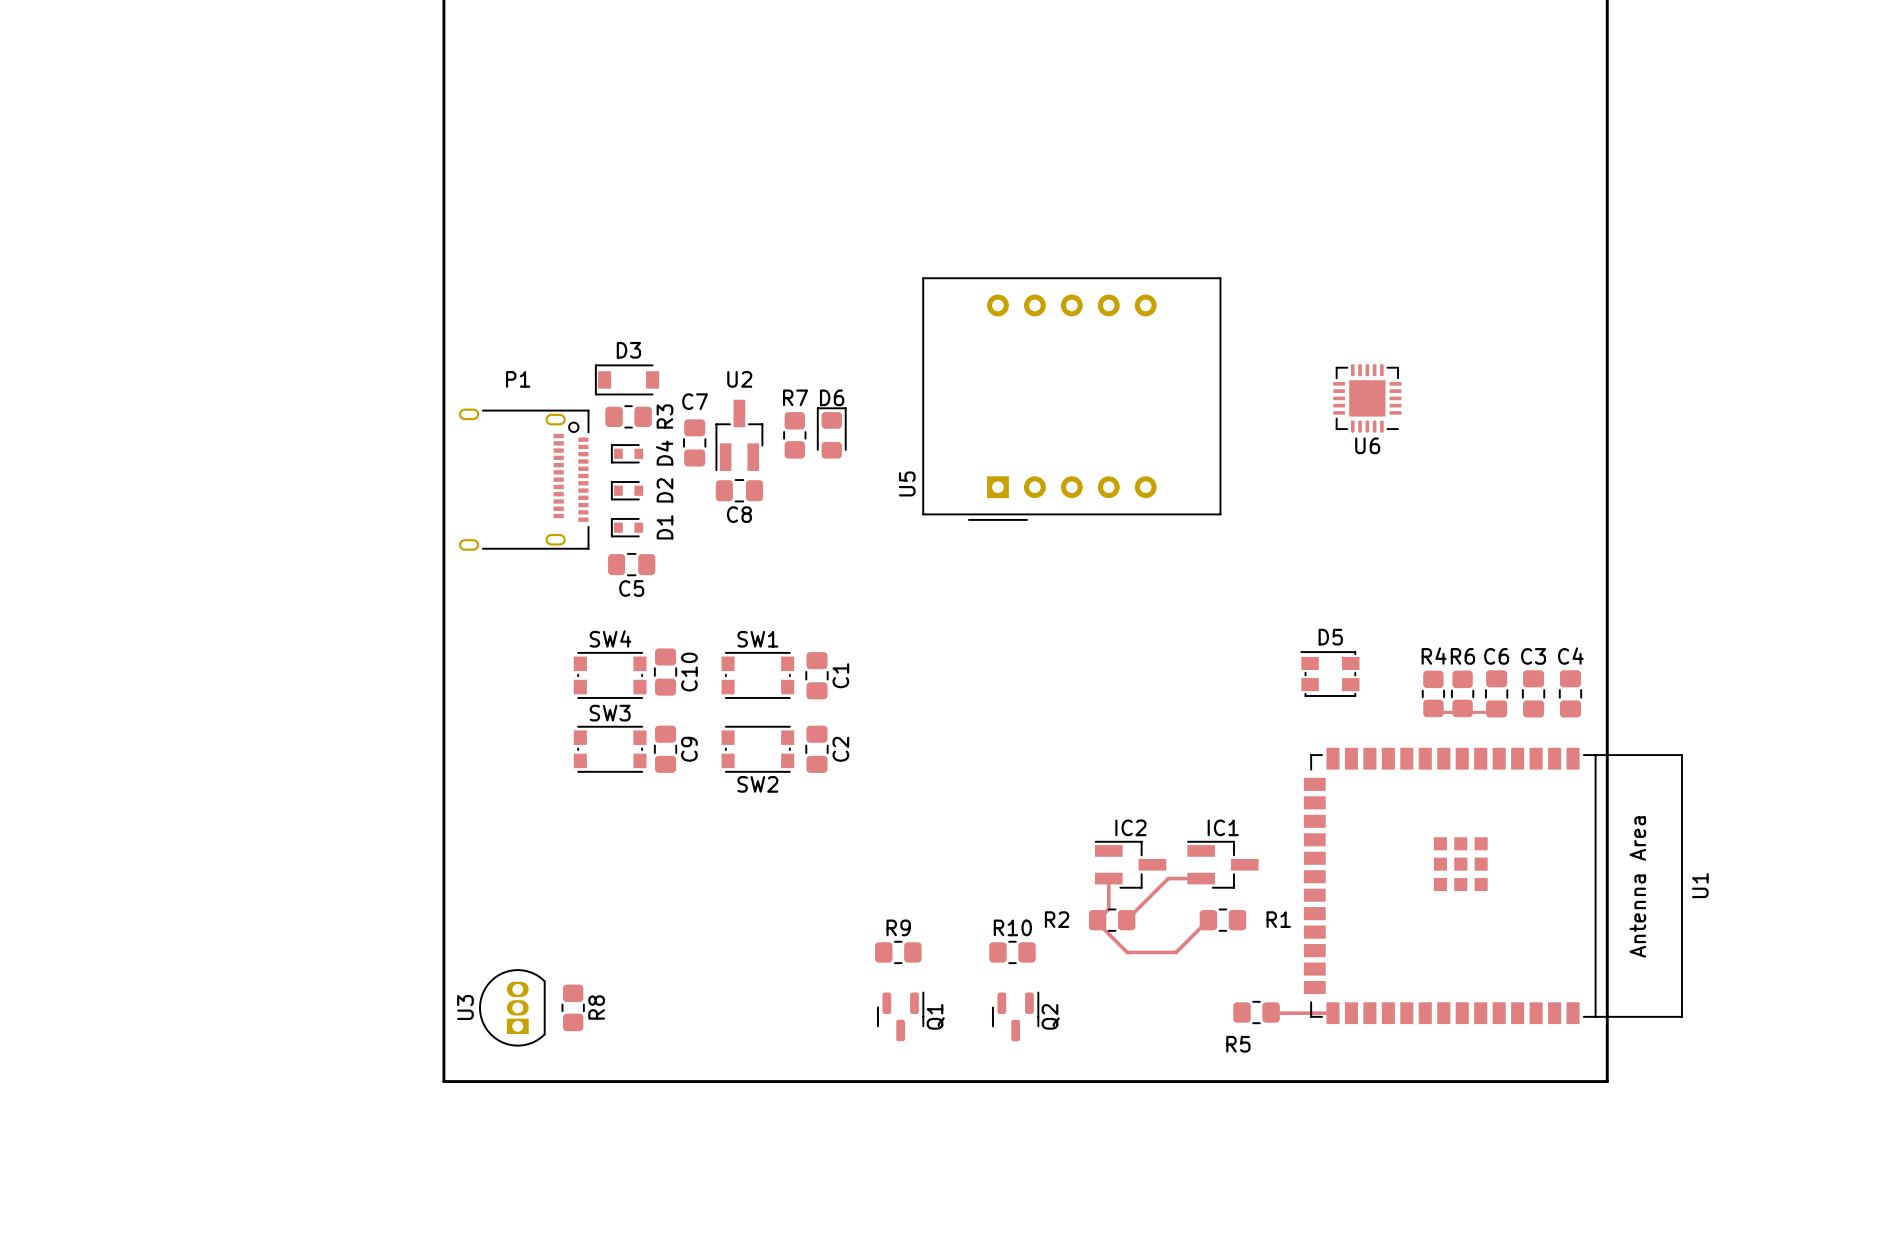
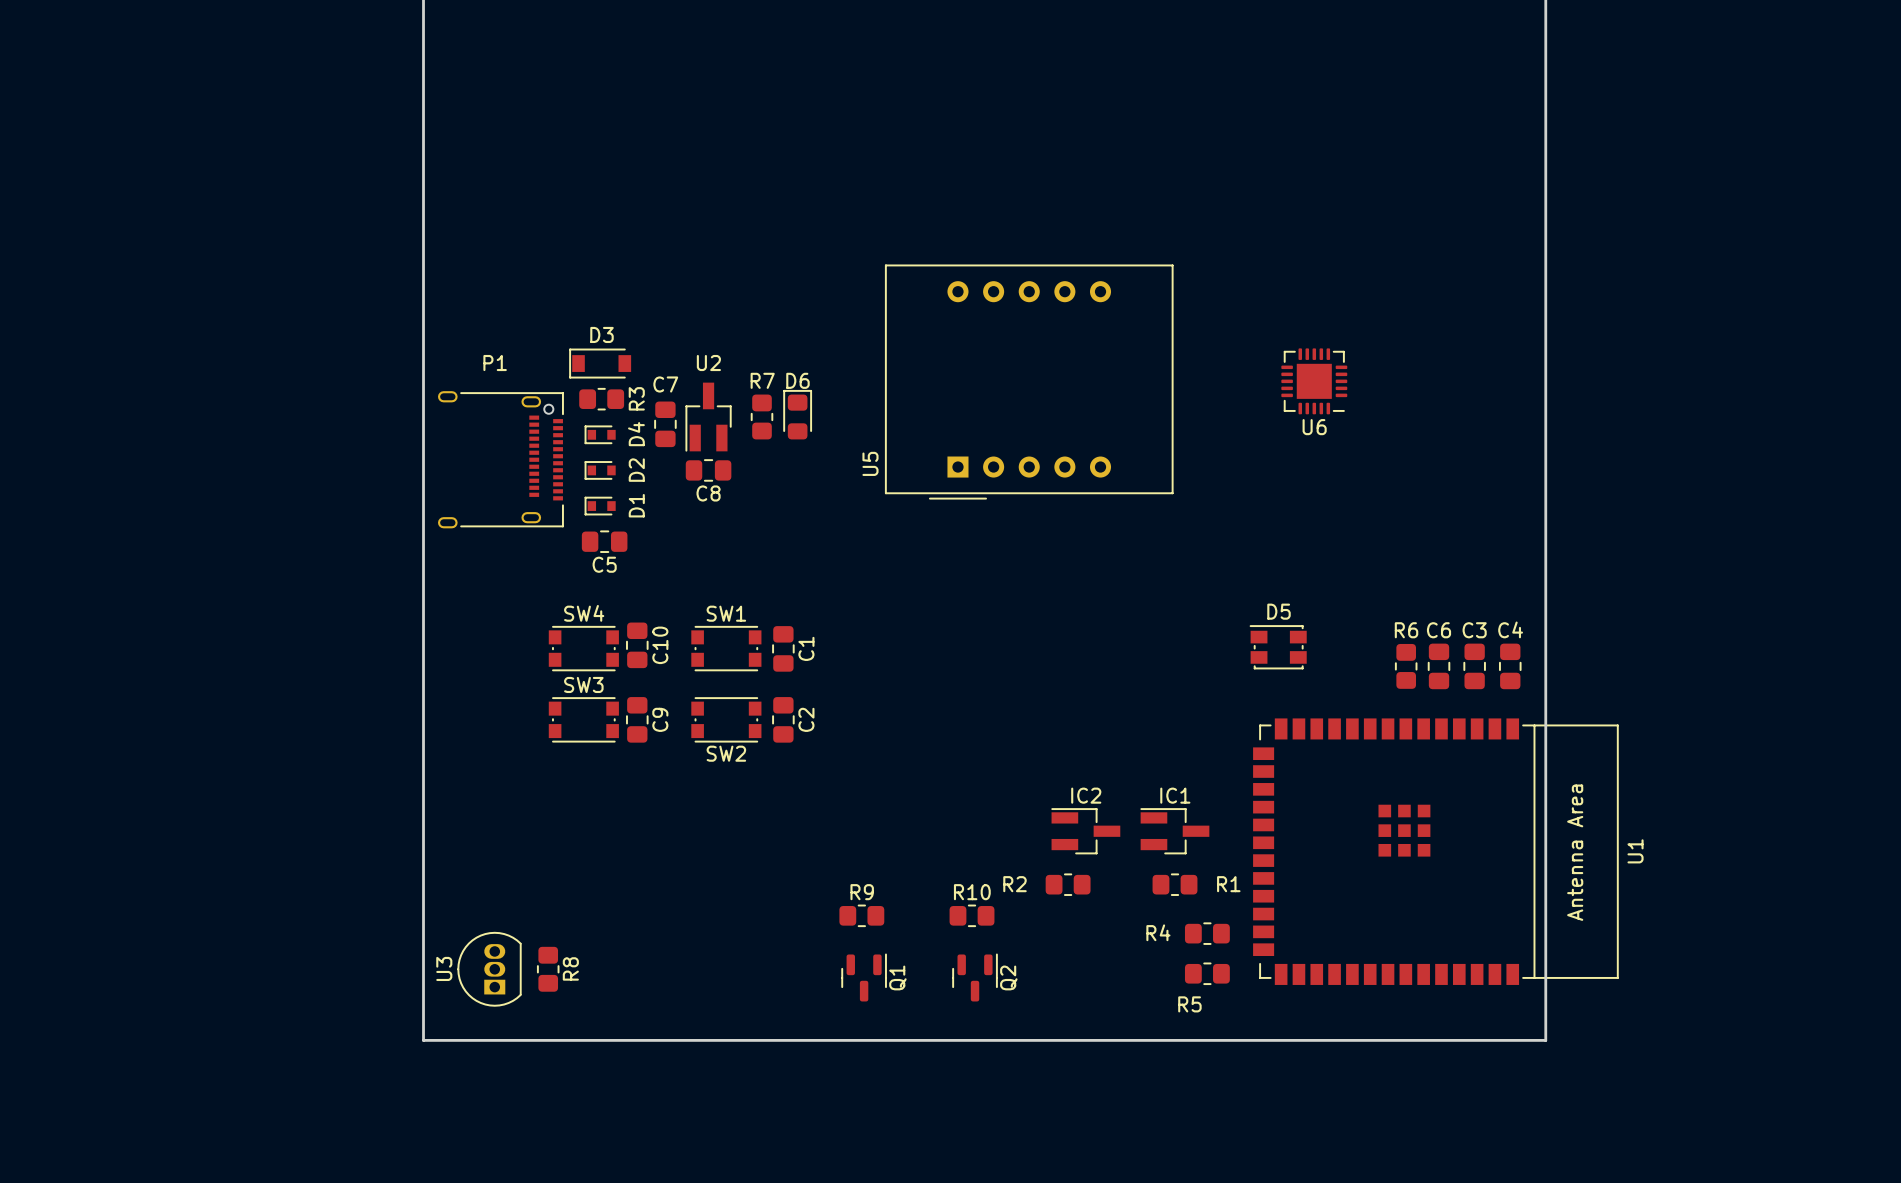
R4 name position: R4 (1434, 656) -> R4 (1158, 932)
R4 rotation: 0° (1433, 693) -> 90° clockwise (1207, 933)
R4 position: (1433, 693) -> (1207, 933)
top track: (1441, 712) (1496, 712) -> none
top track: (1108, 878) (1108, 908) (1097, 920) (1097, 922) (1127, 952) (1176, 952) (1208, 920) -> none
top track: (1201, 878) (1168, 878) (1126, 920) -> none
top track: (1271, 1012) (1332, 1013) -> none

